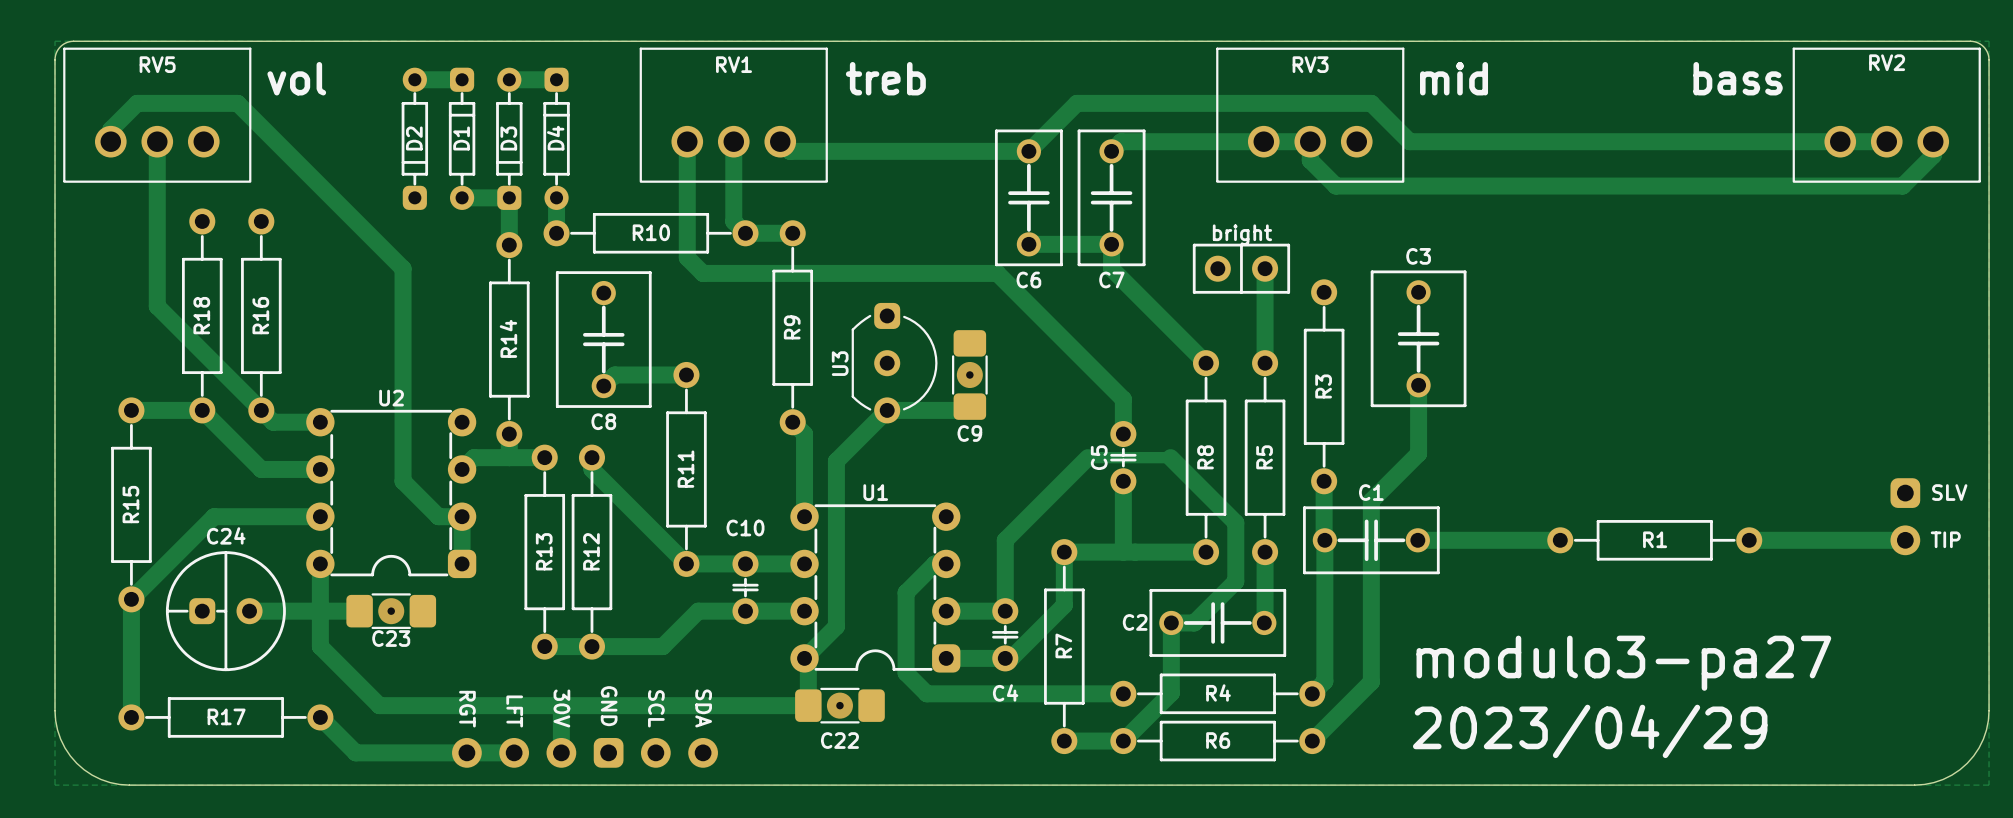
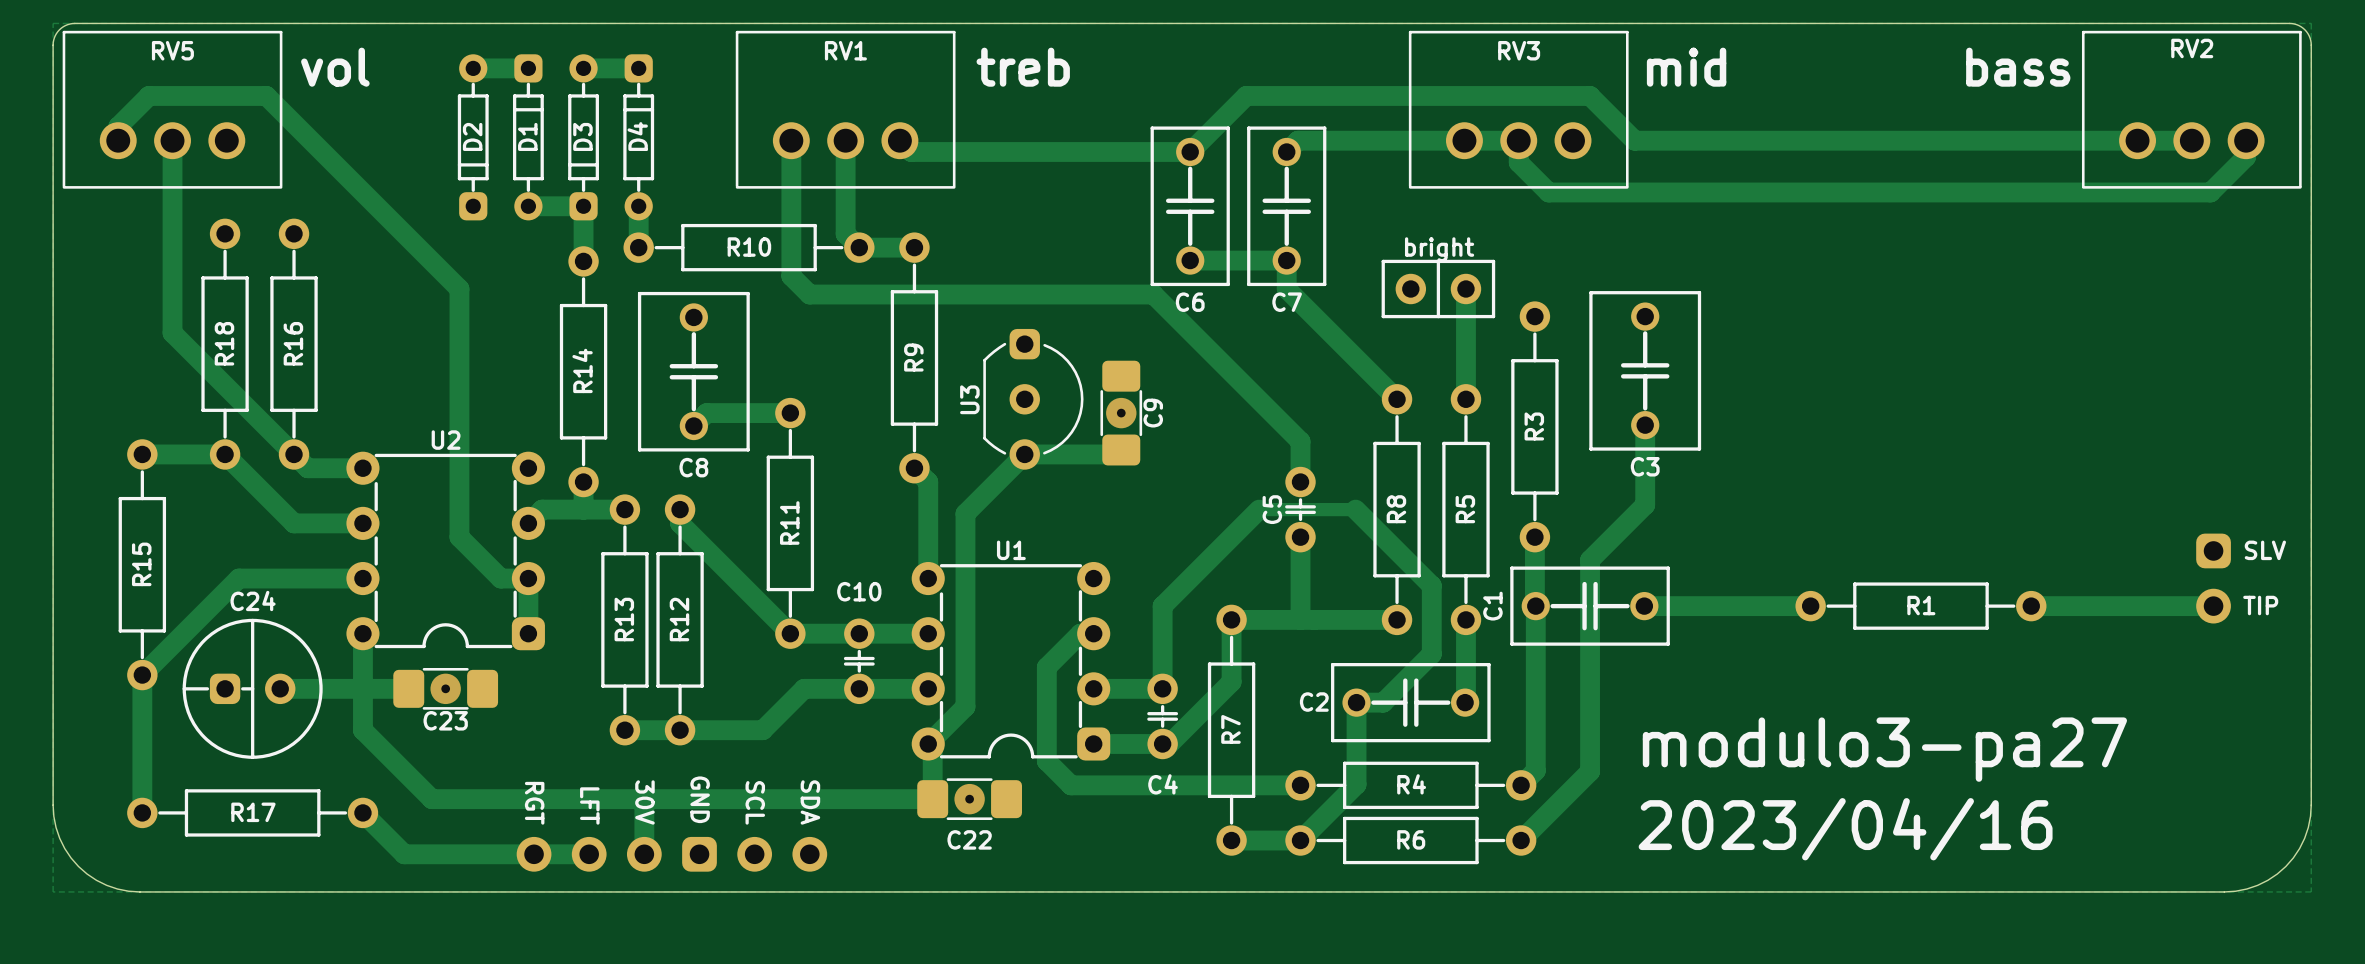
C3 name position: C3 (1418, 256) -> C3 (1645, 466)
C9 name rotation: 0° (969, 433) -> 90° counterclockwise (1153, 413)
C9 name position: C9 (969, 433) -> C9 (1153, 413)
C1 name rotation: 0° (1371, 492) -> 90° counterclockwise (1492, 606)
C1 name position: C1 (1371, 492) -> C1 (1492, 606)
text: 2023/04/29 (1590, 731) -> 2023/04/16 (1845, 829)

